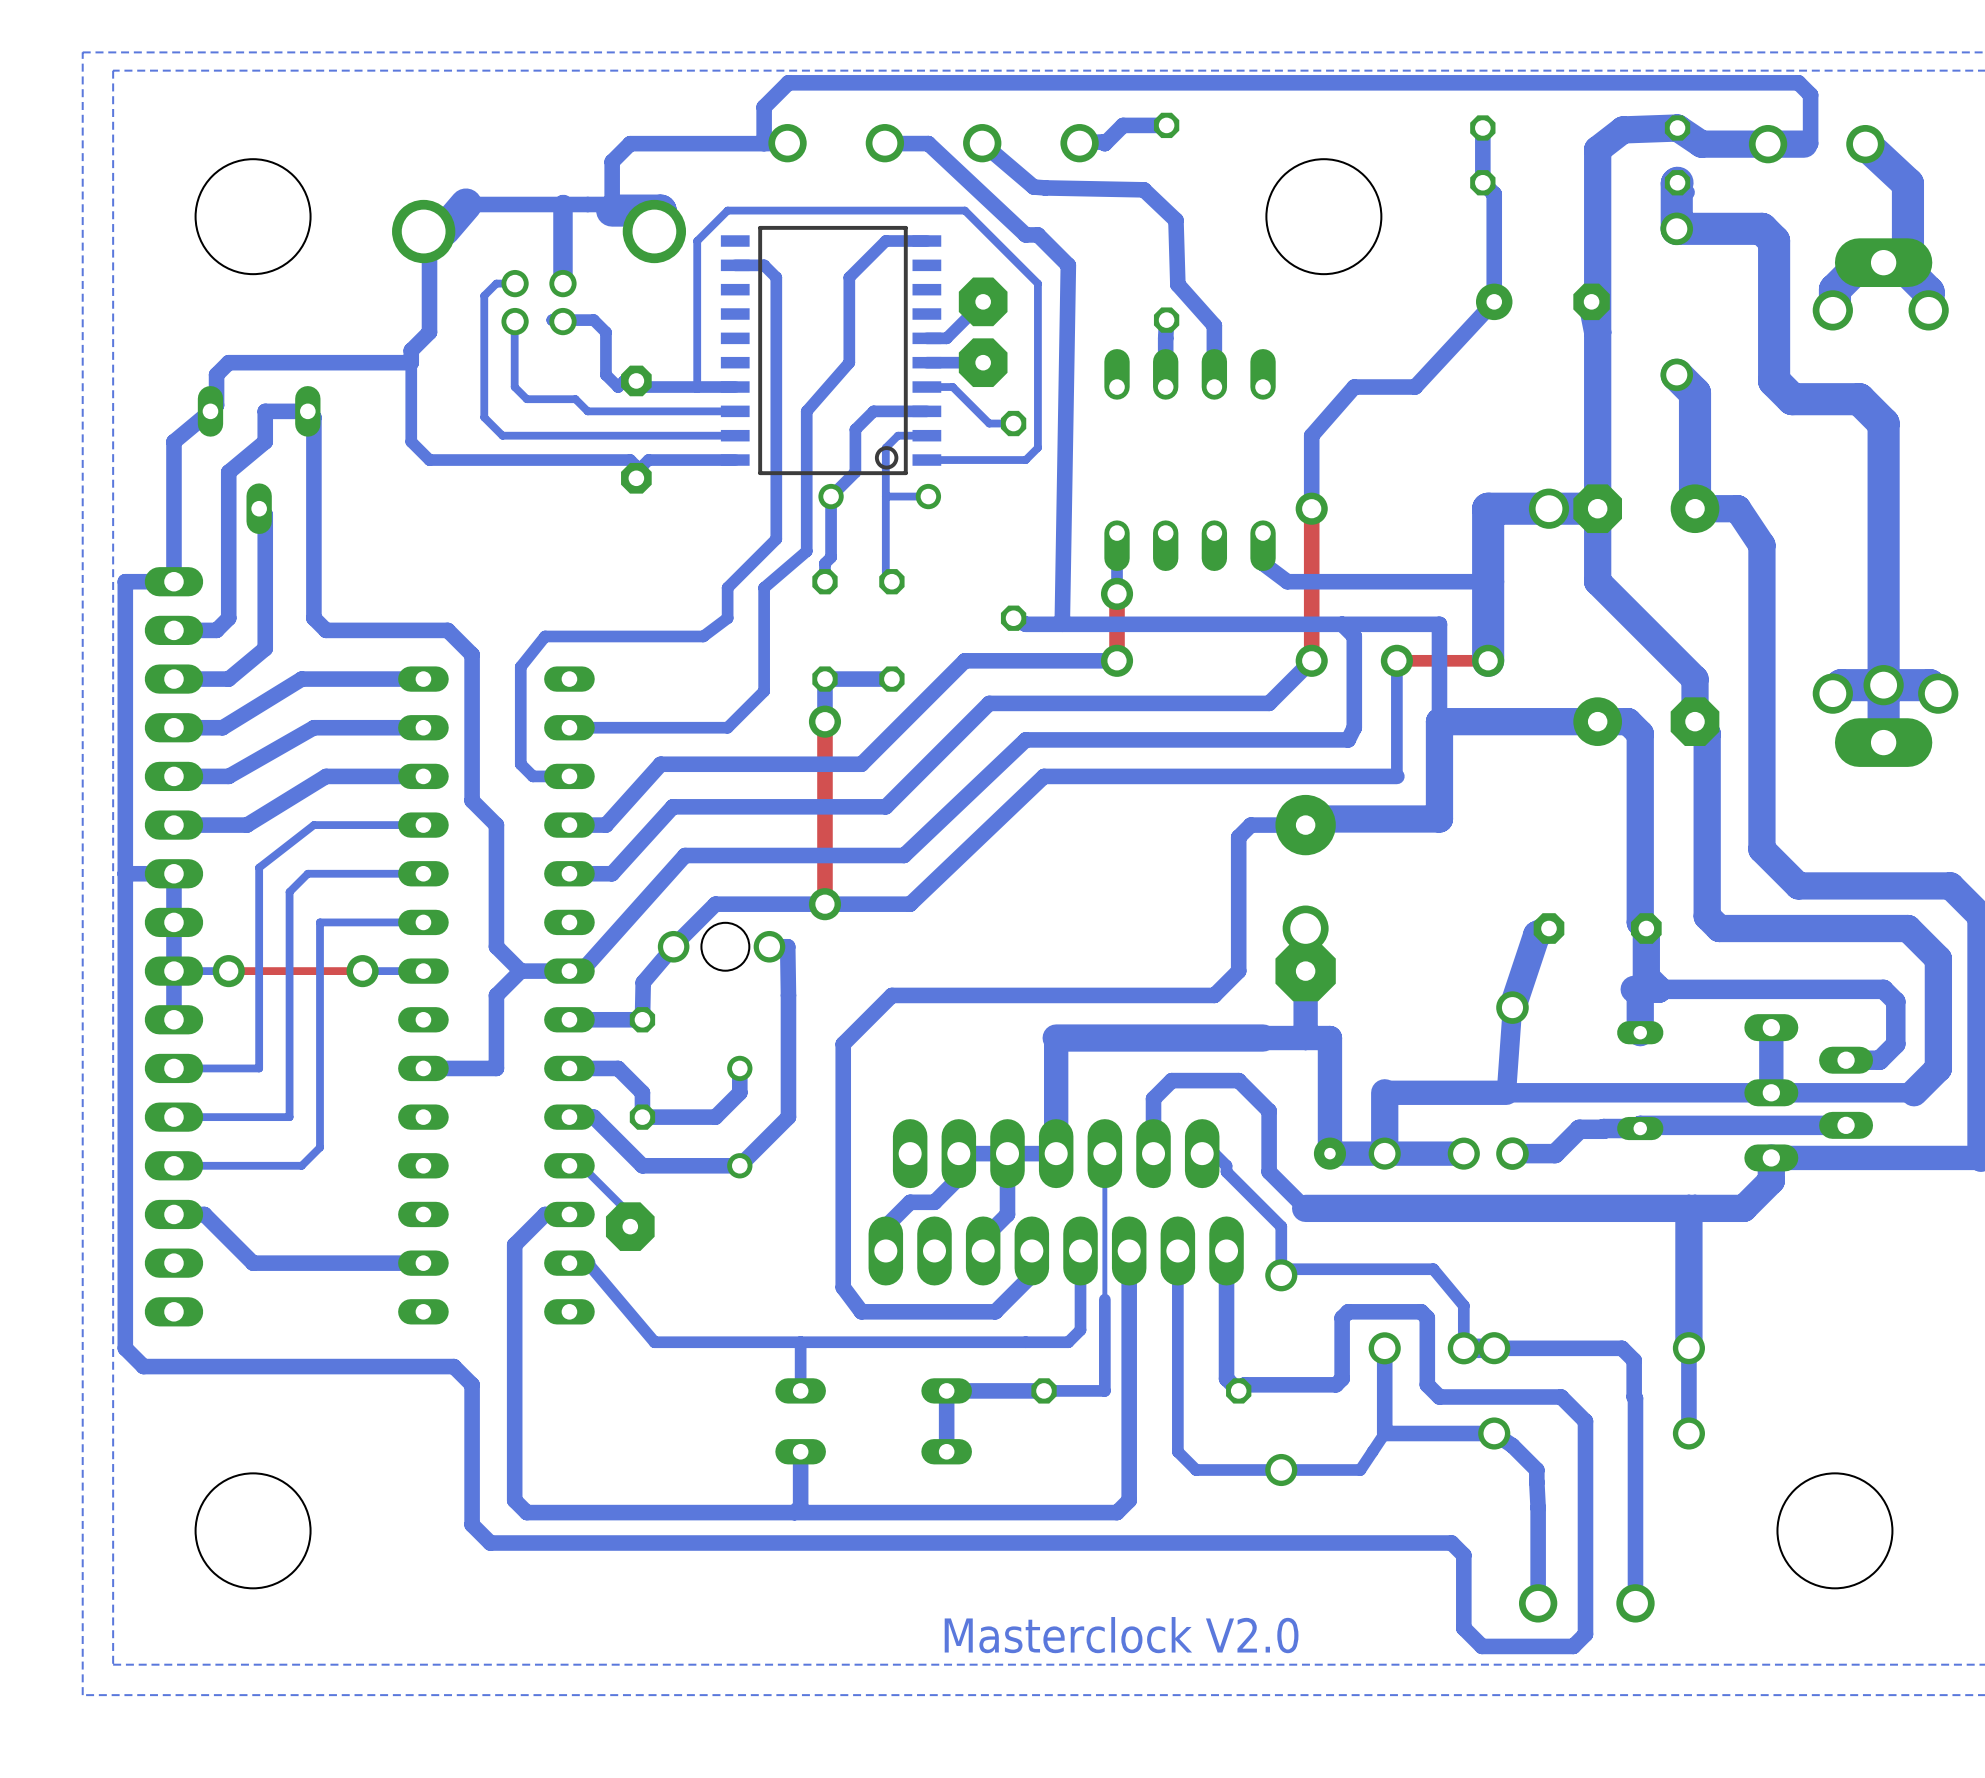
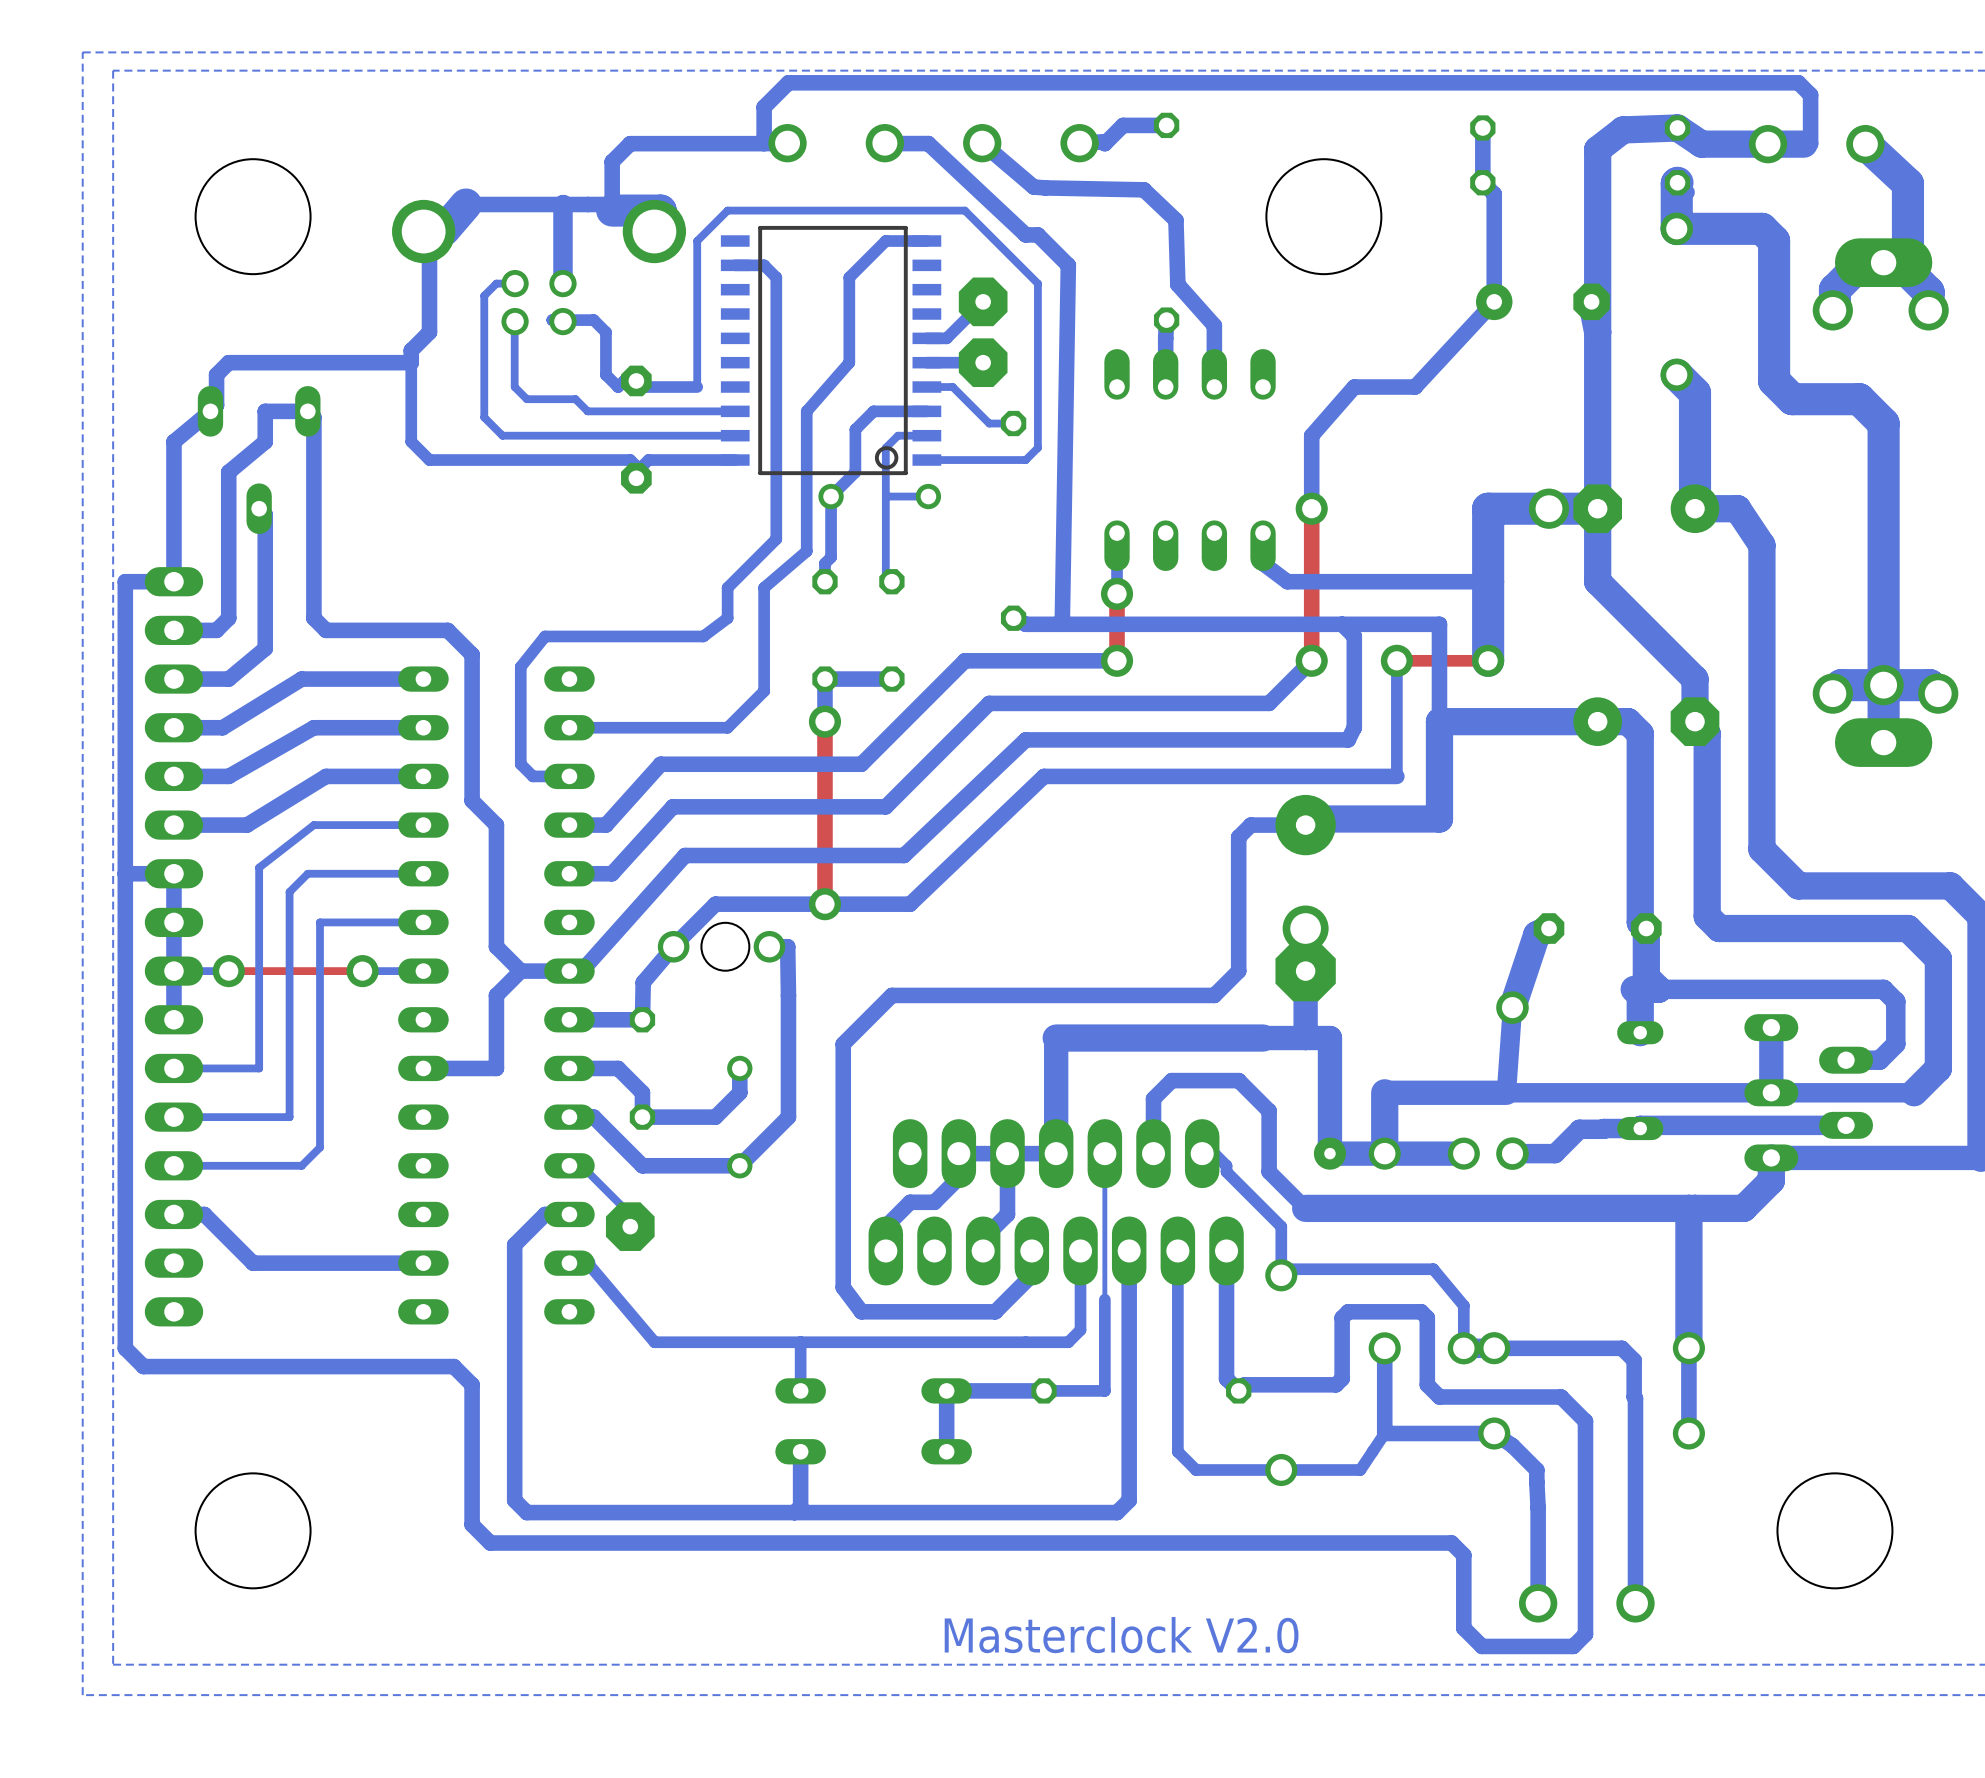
bottom track: (735, 387) (697, 387) -> none

